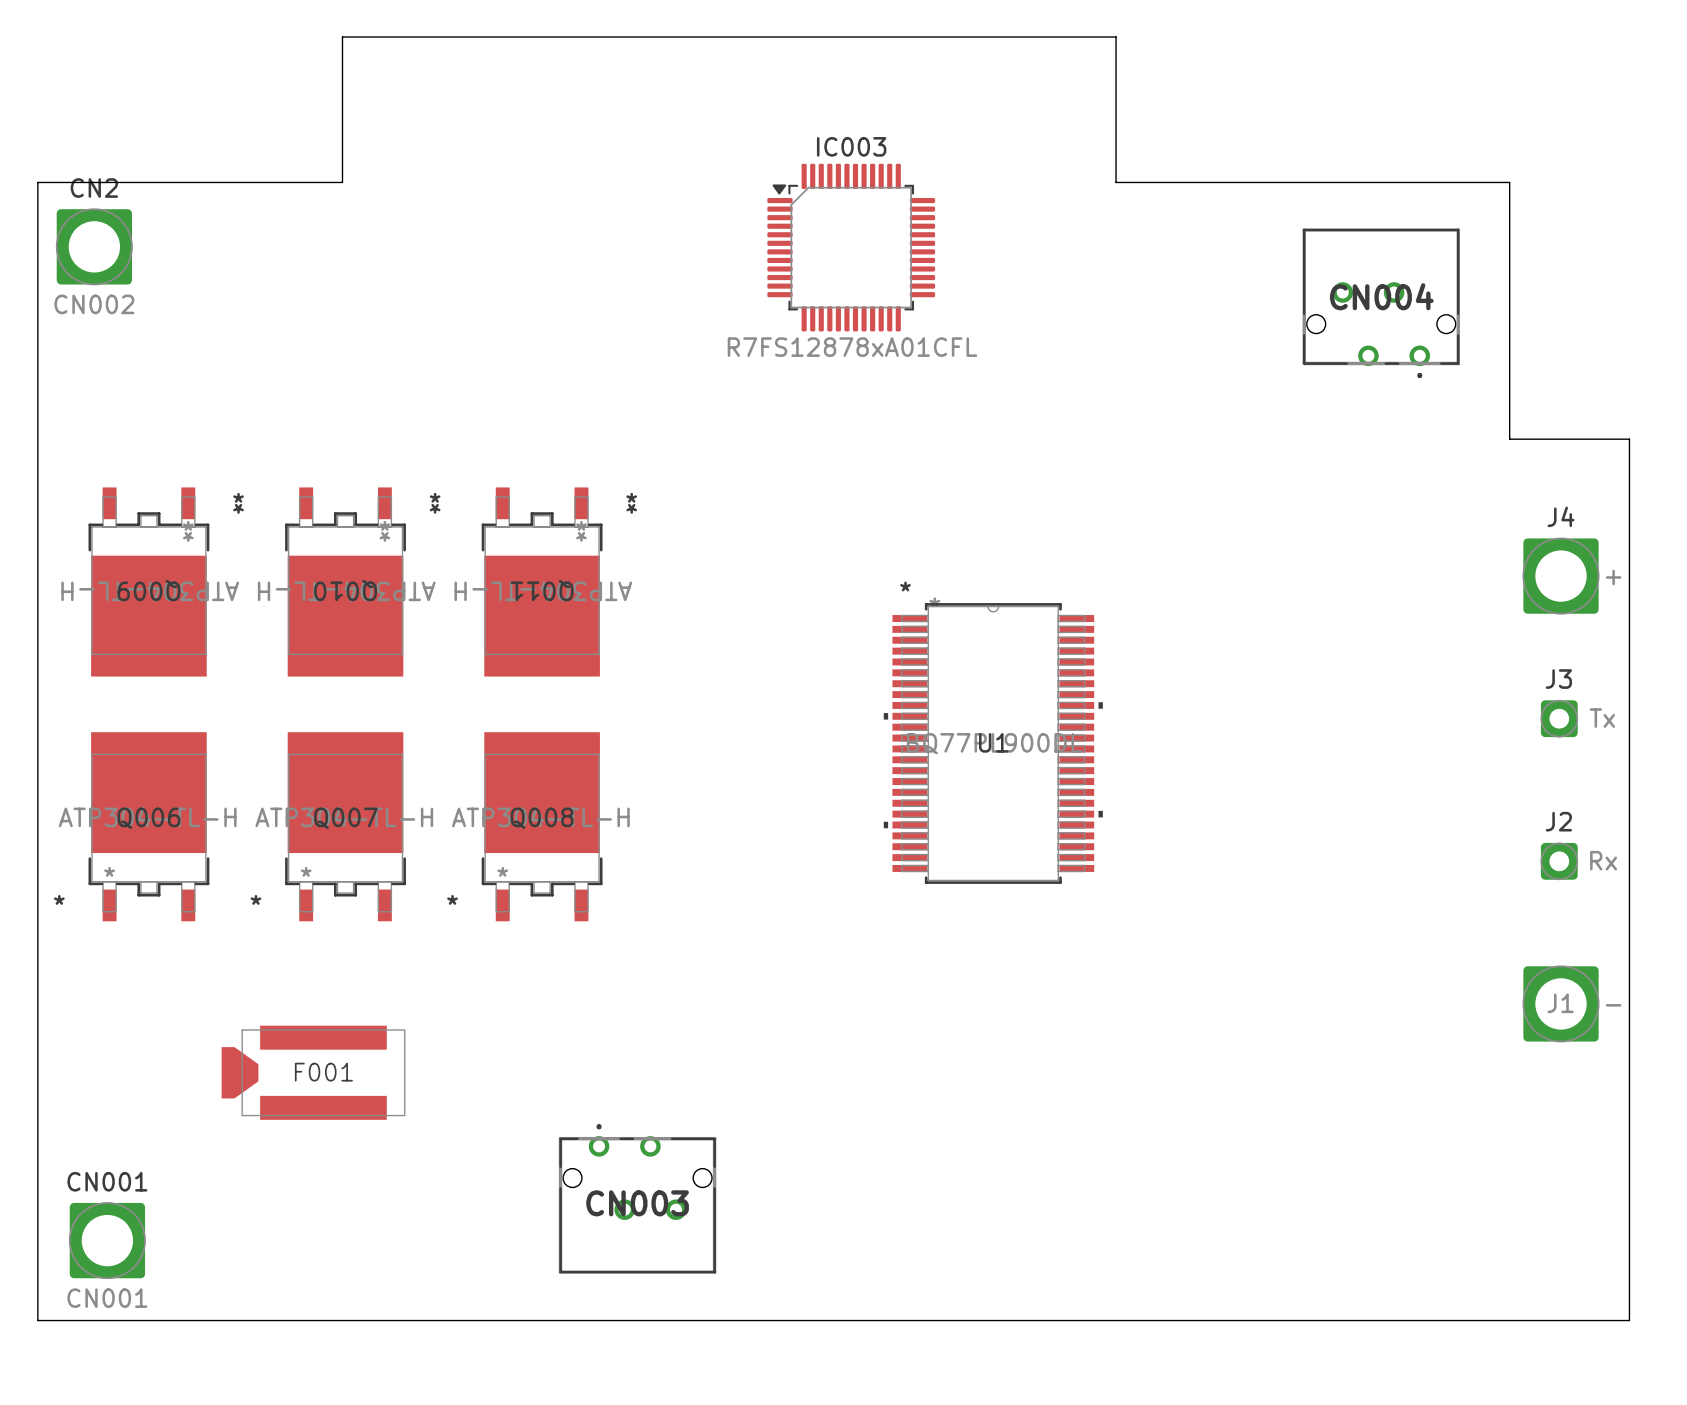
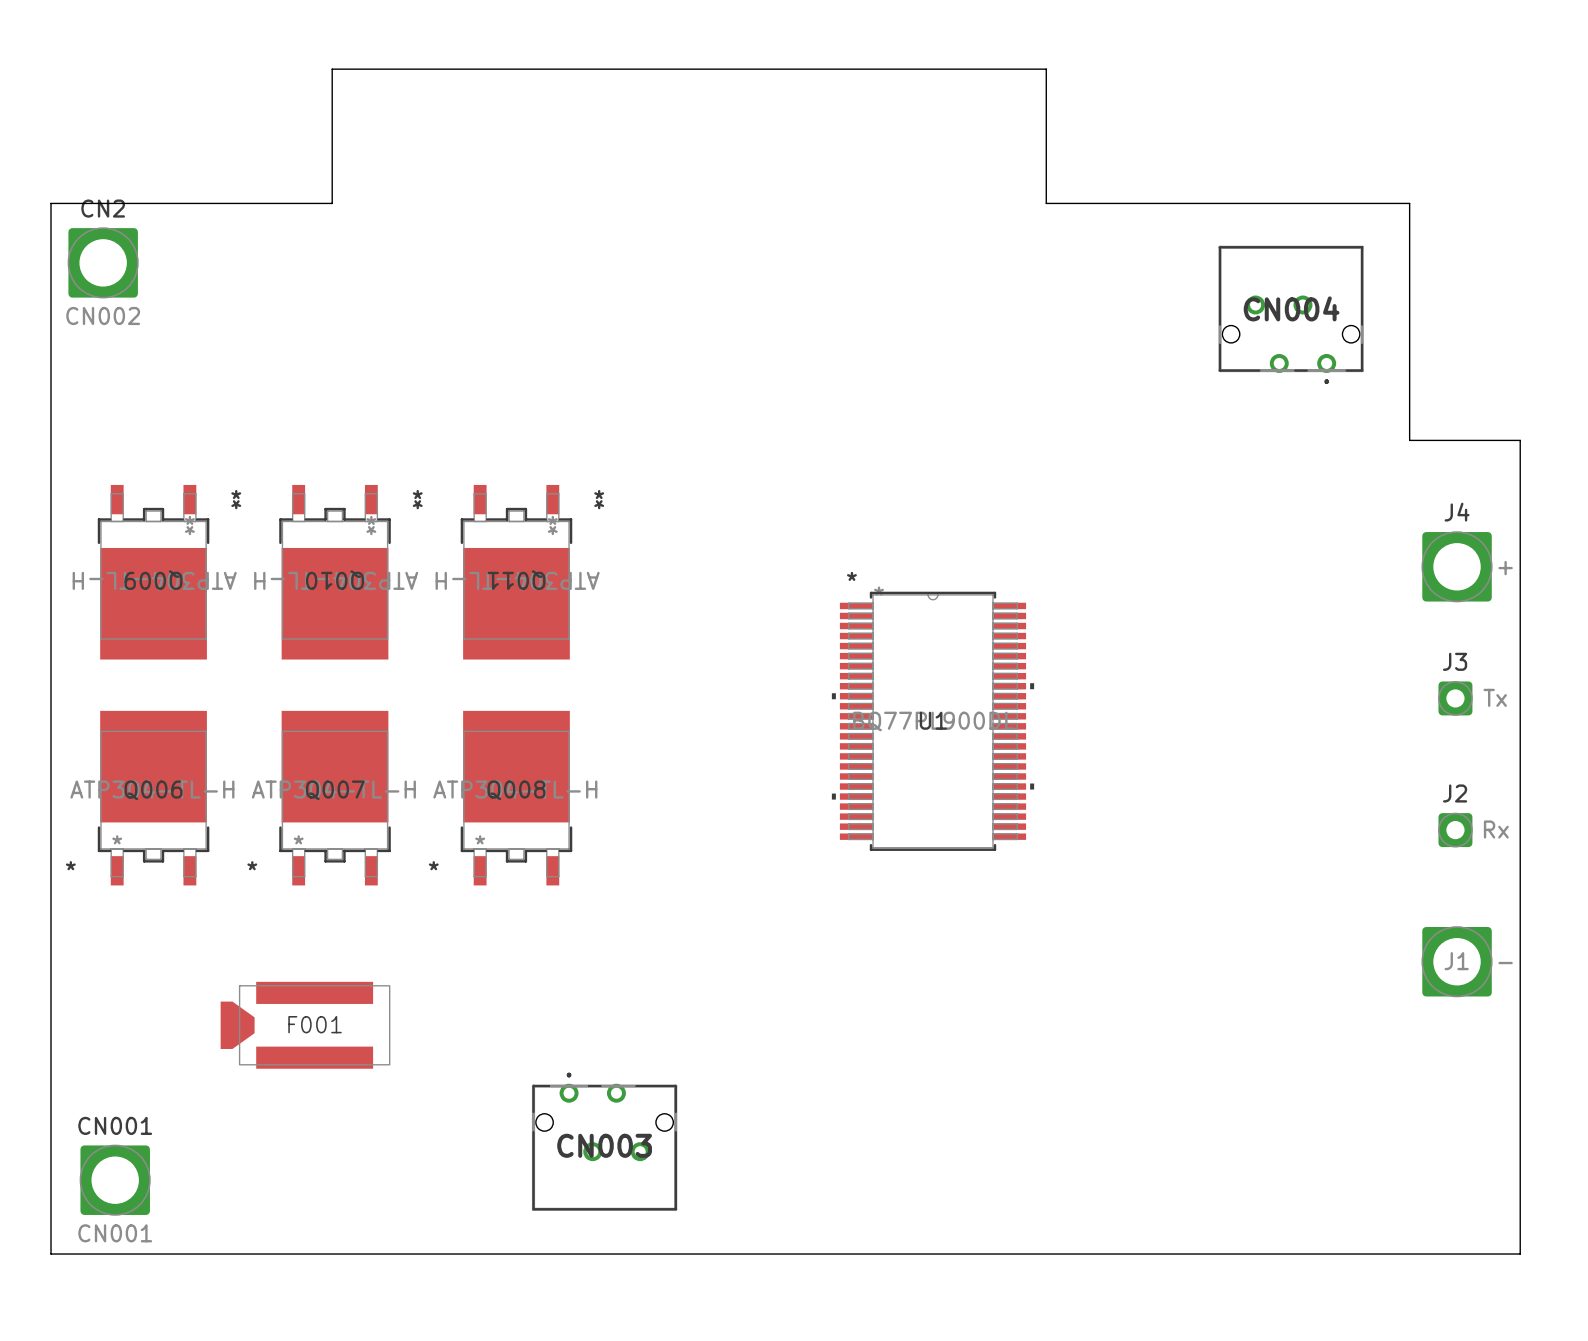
IC003: R7FS12878xA01CFL (851, 247) -> none

